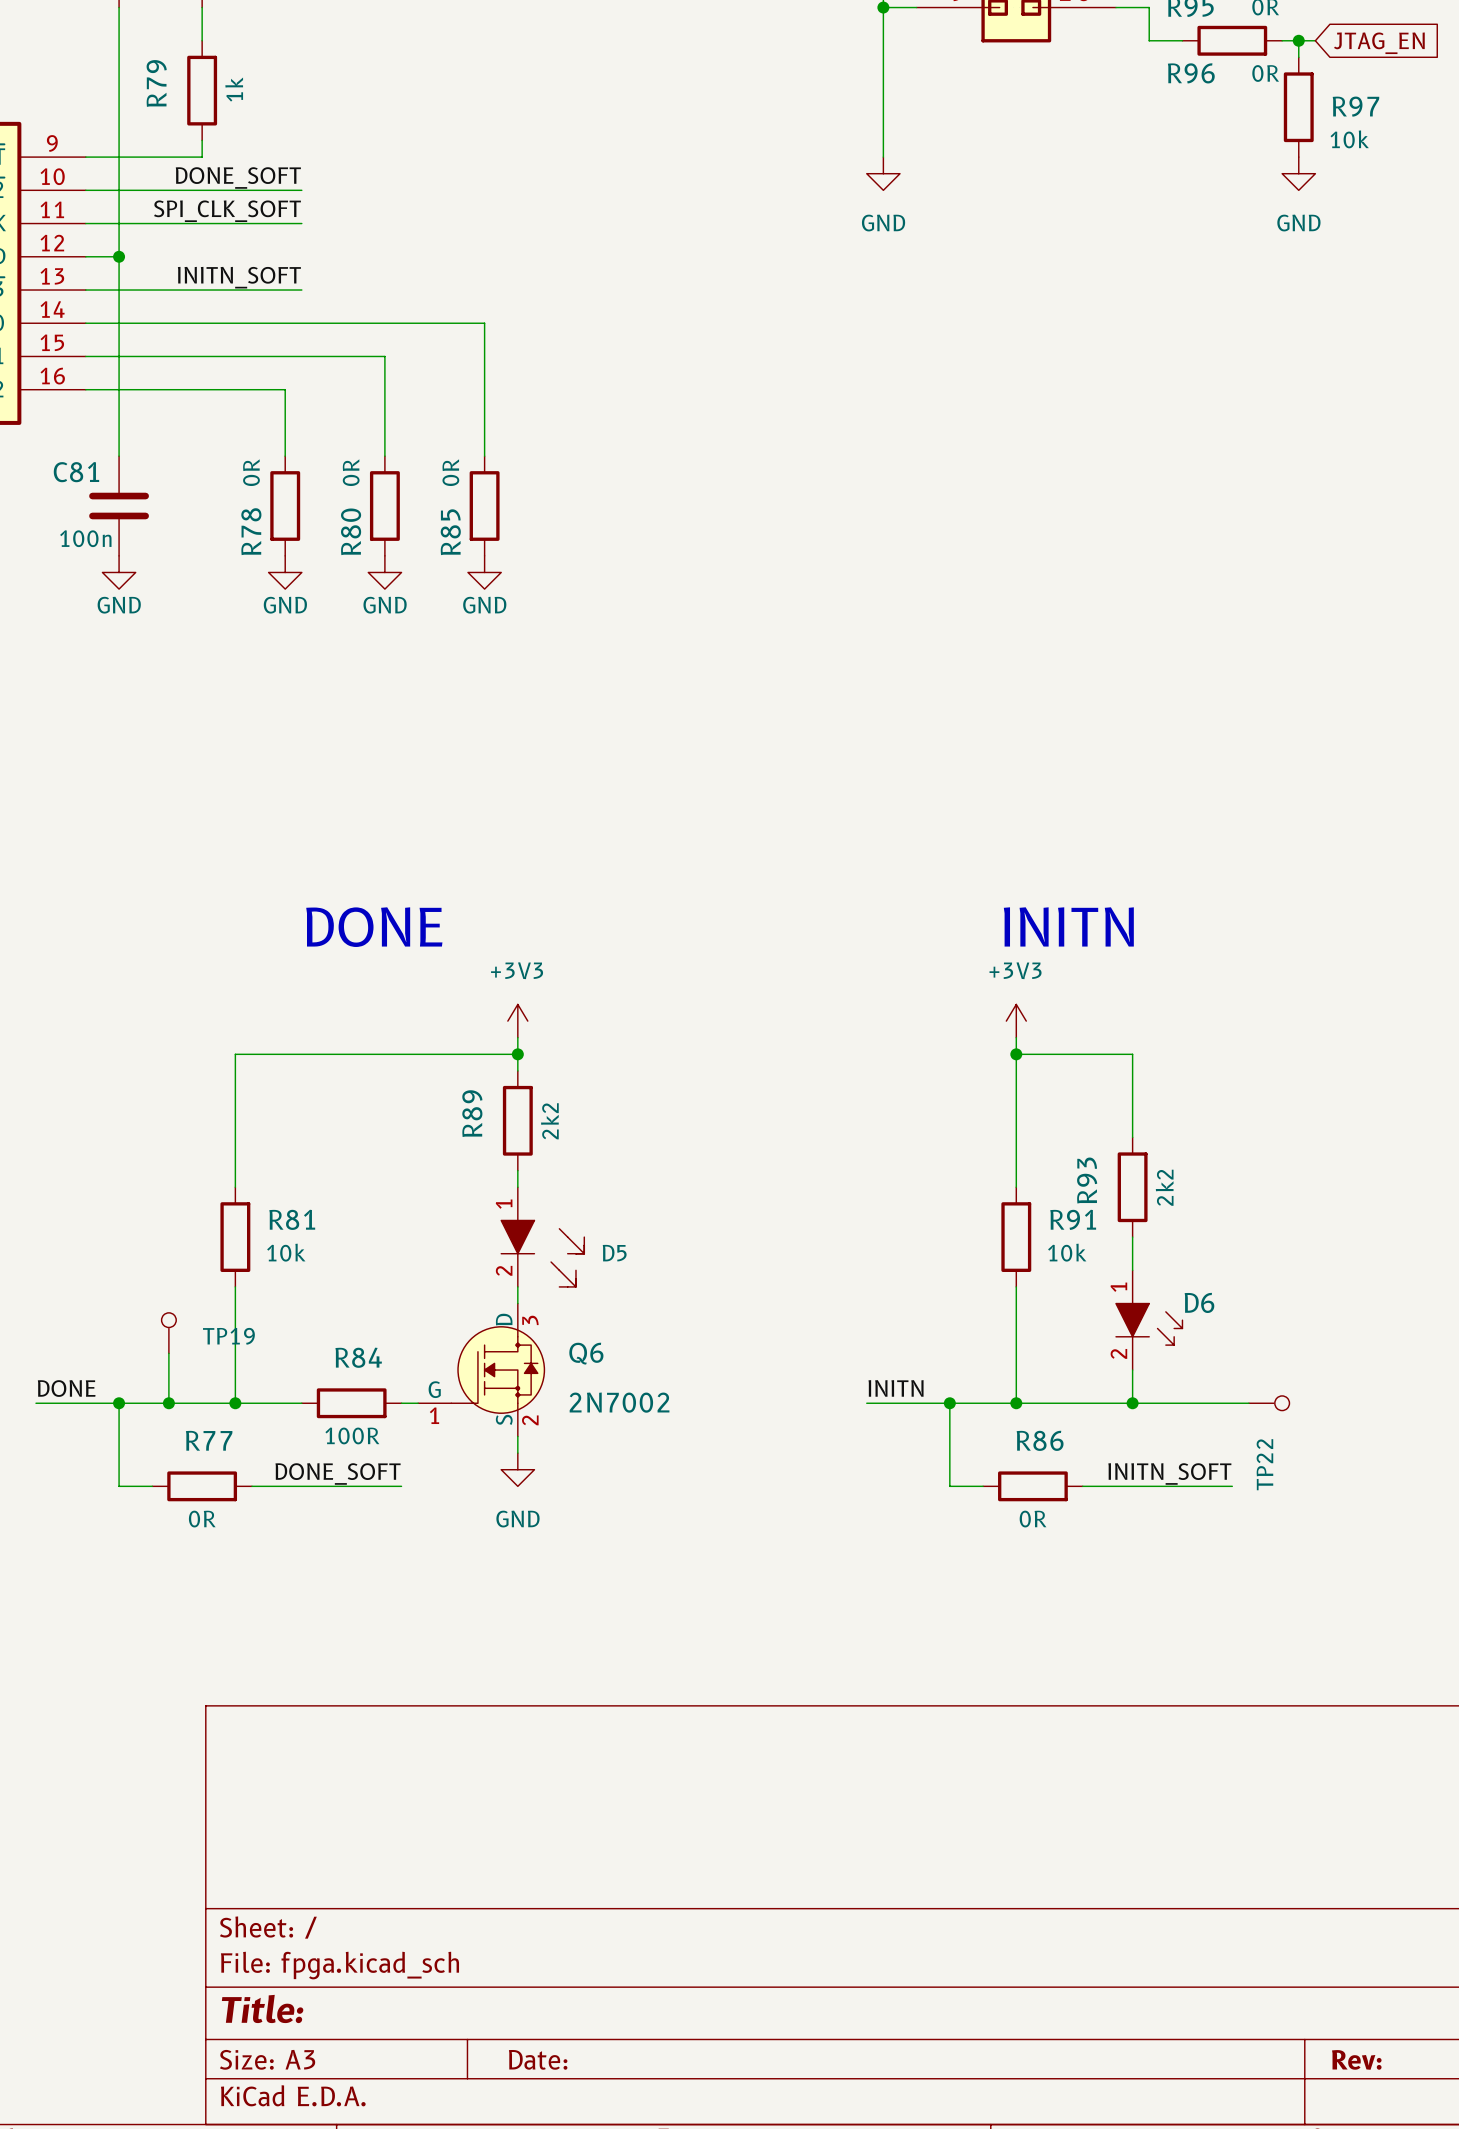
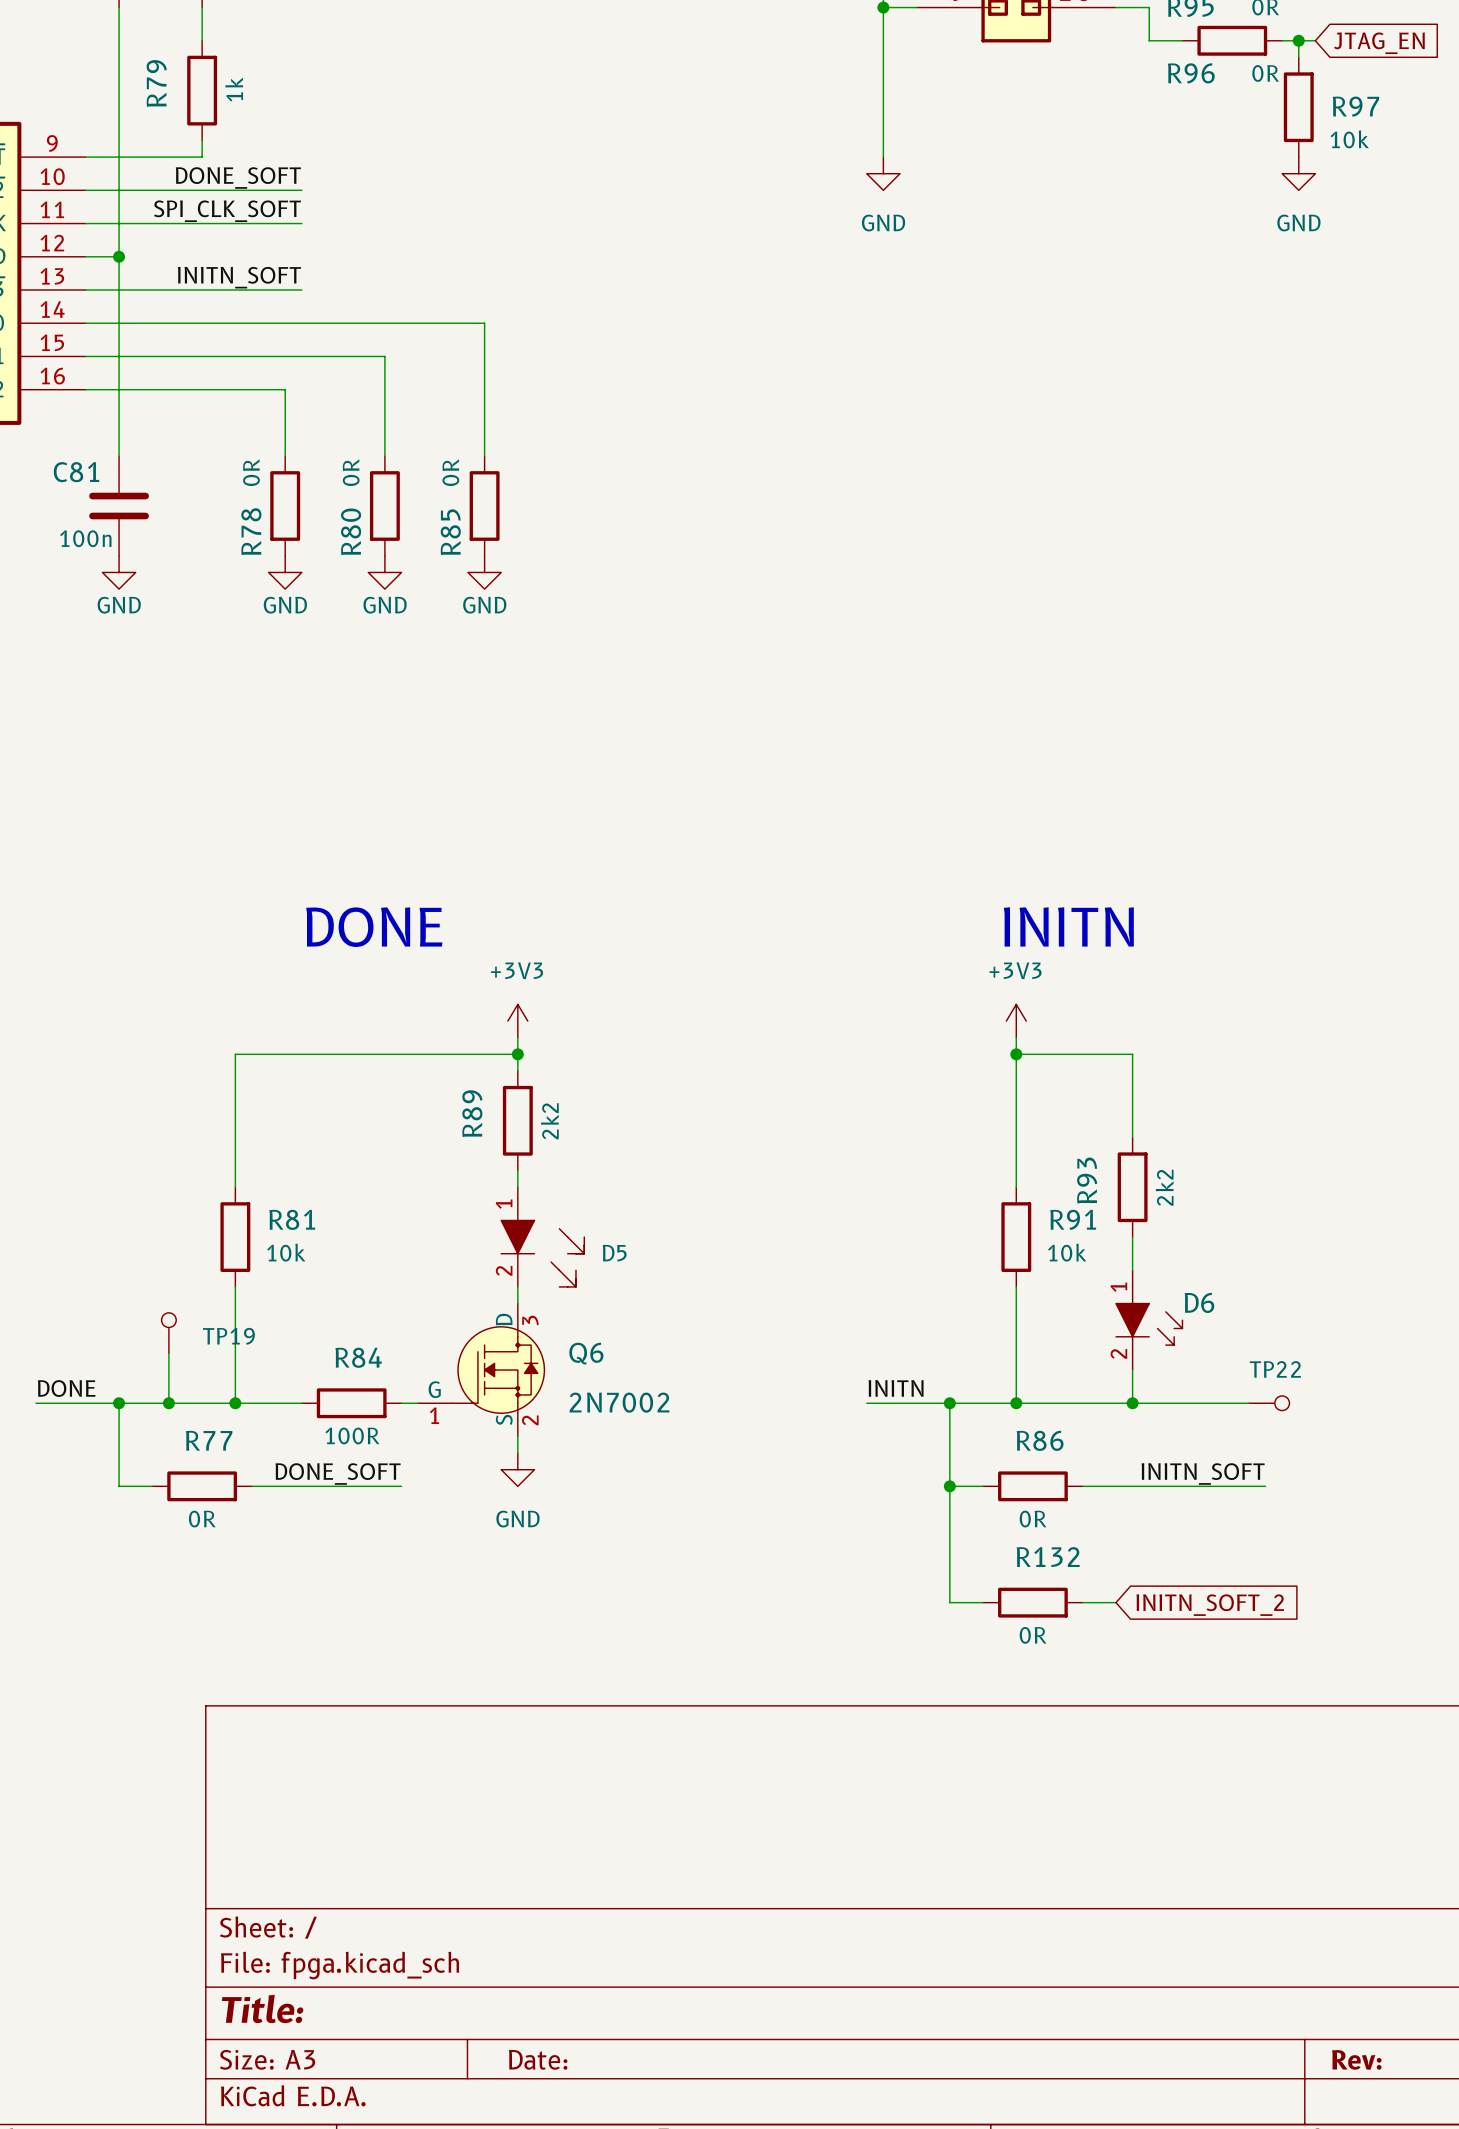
TP22 name rotation: 0° (1264, 1464) -> 90° clockwise (1275, 1369)
TP22 name position: TP22 (1264, 1464) -> TP22 (1275, 1369)
label position: INITN_SOFT (1169, 1473) -> INITN_SOFT (1203, 1473)
wire: none -> (949, 1486) (949, 1602) (983, 1602)
junction: none -> (949, 1486)
wire: none -> (1232, 1486) (1265, 1486)
R132: none -> (1032, 1602)
wire: none -> (1082, 1602) (1115, 1602)
global label: none -> INITN_SOFT_2 (1210, 1605)

